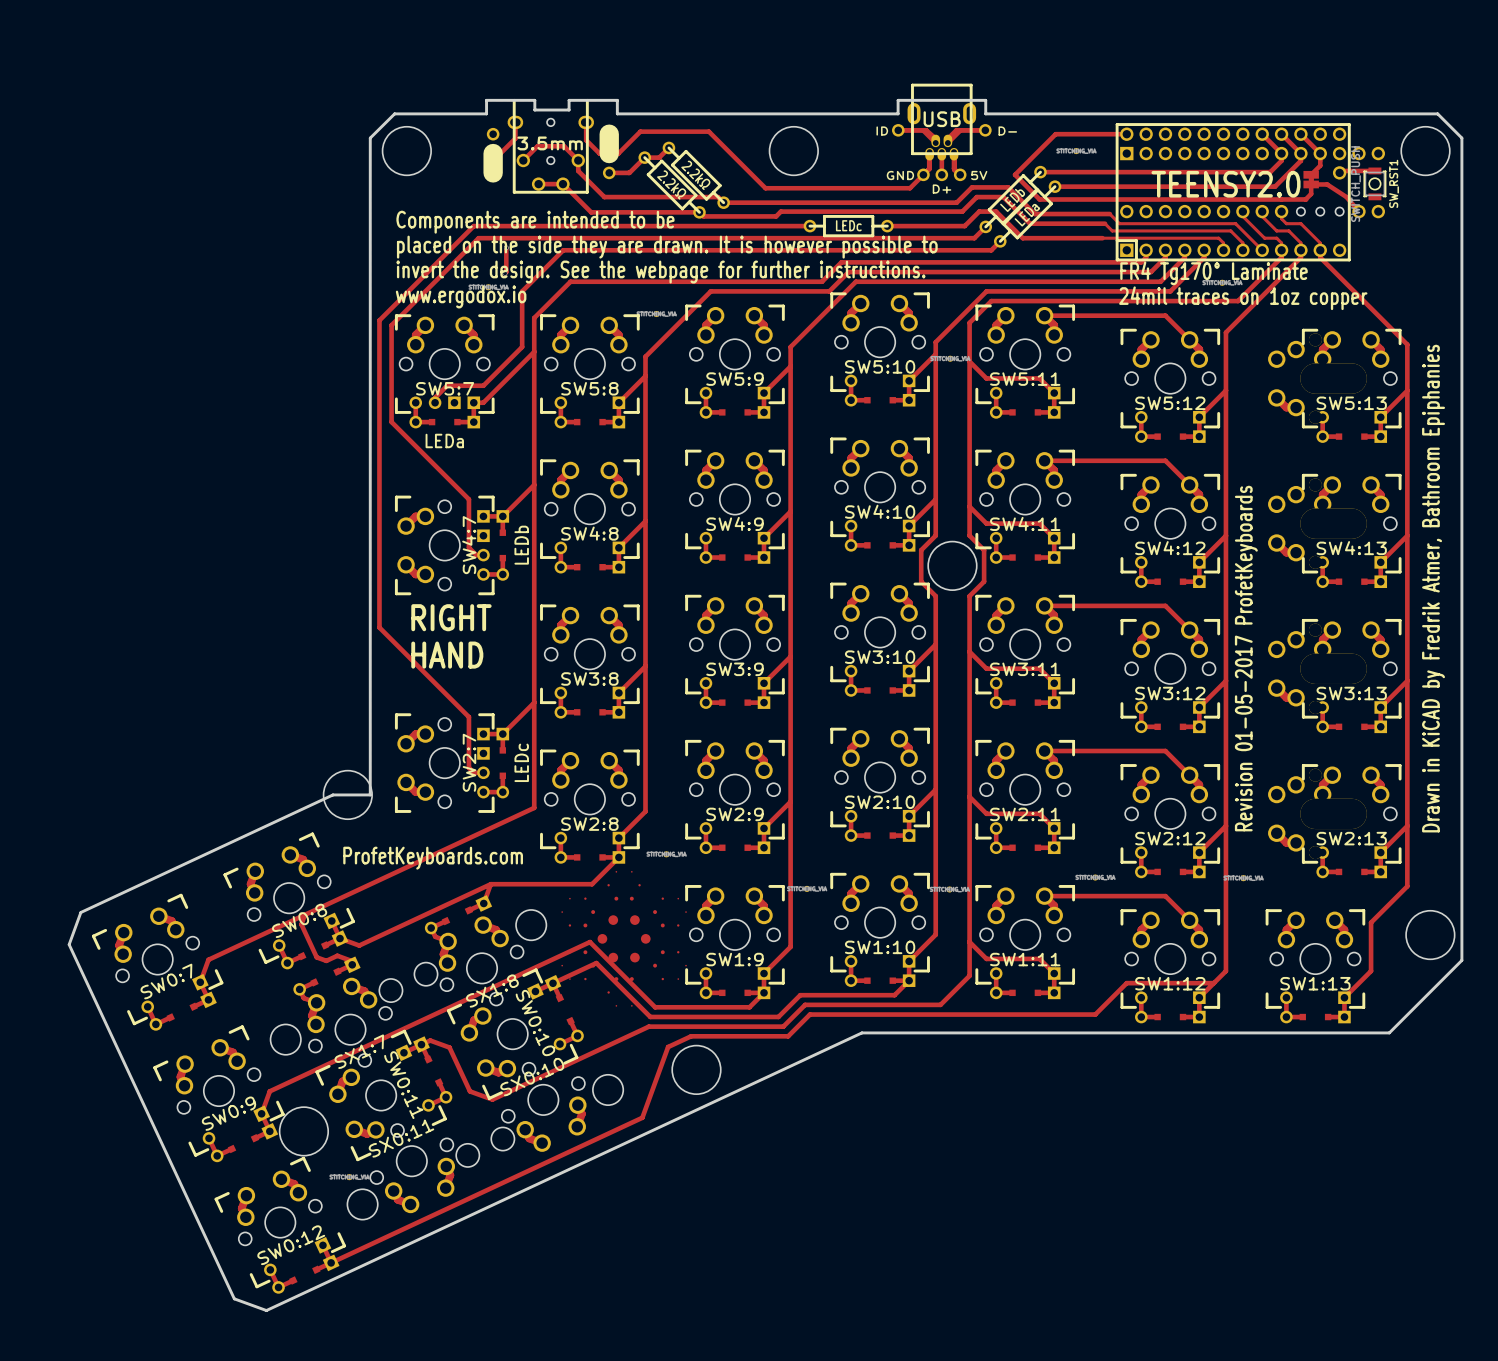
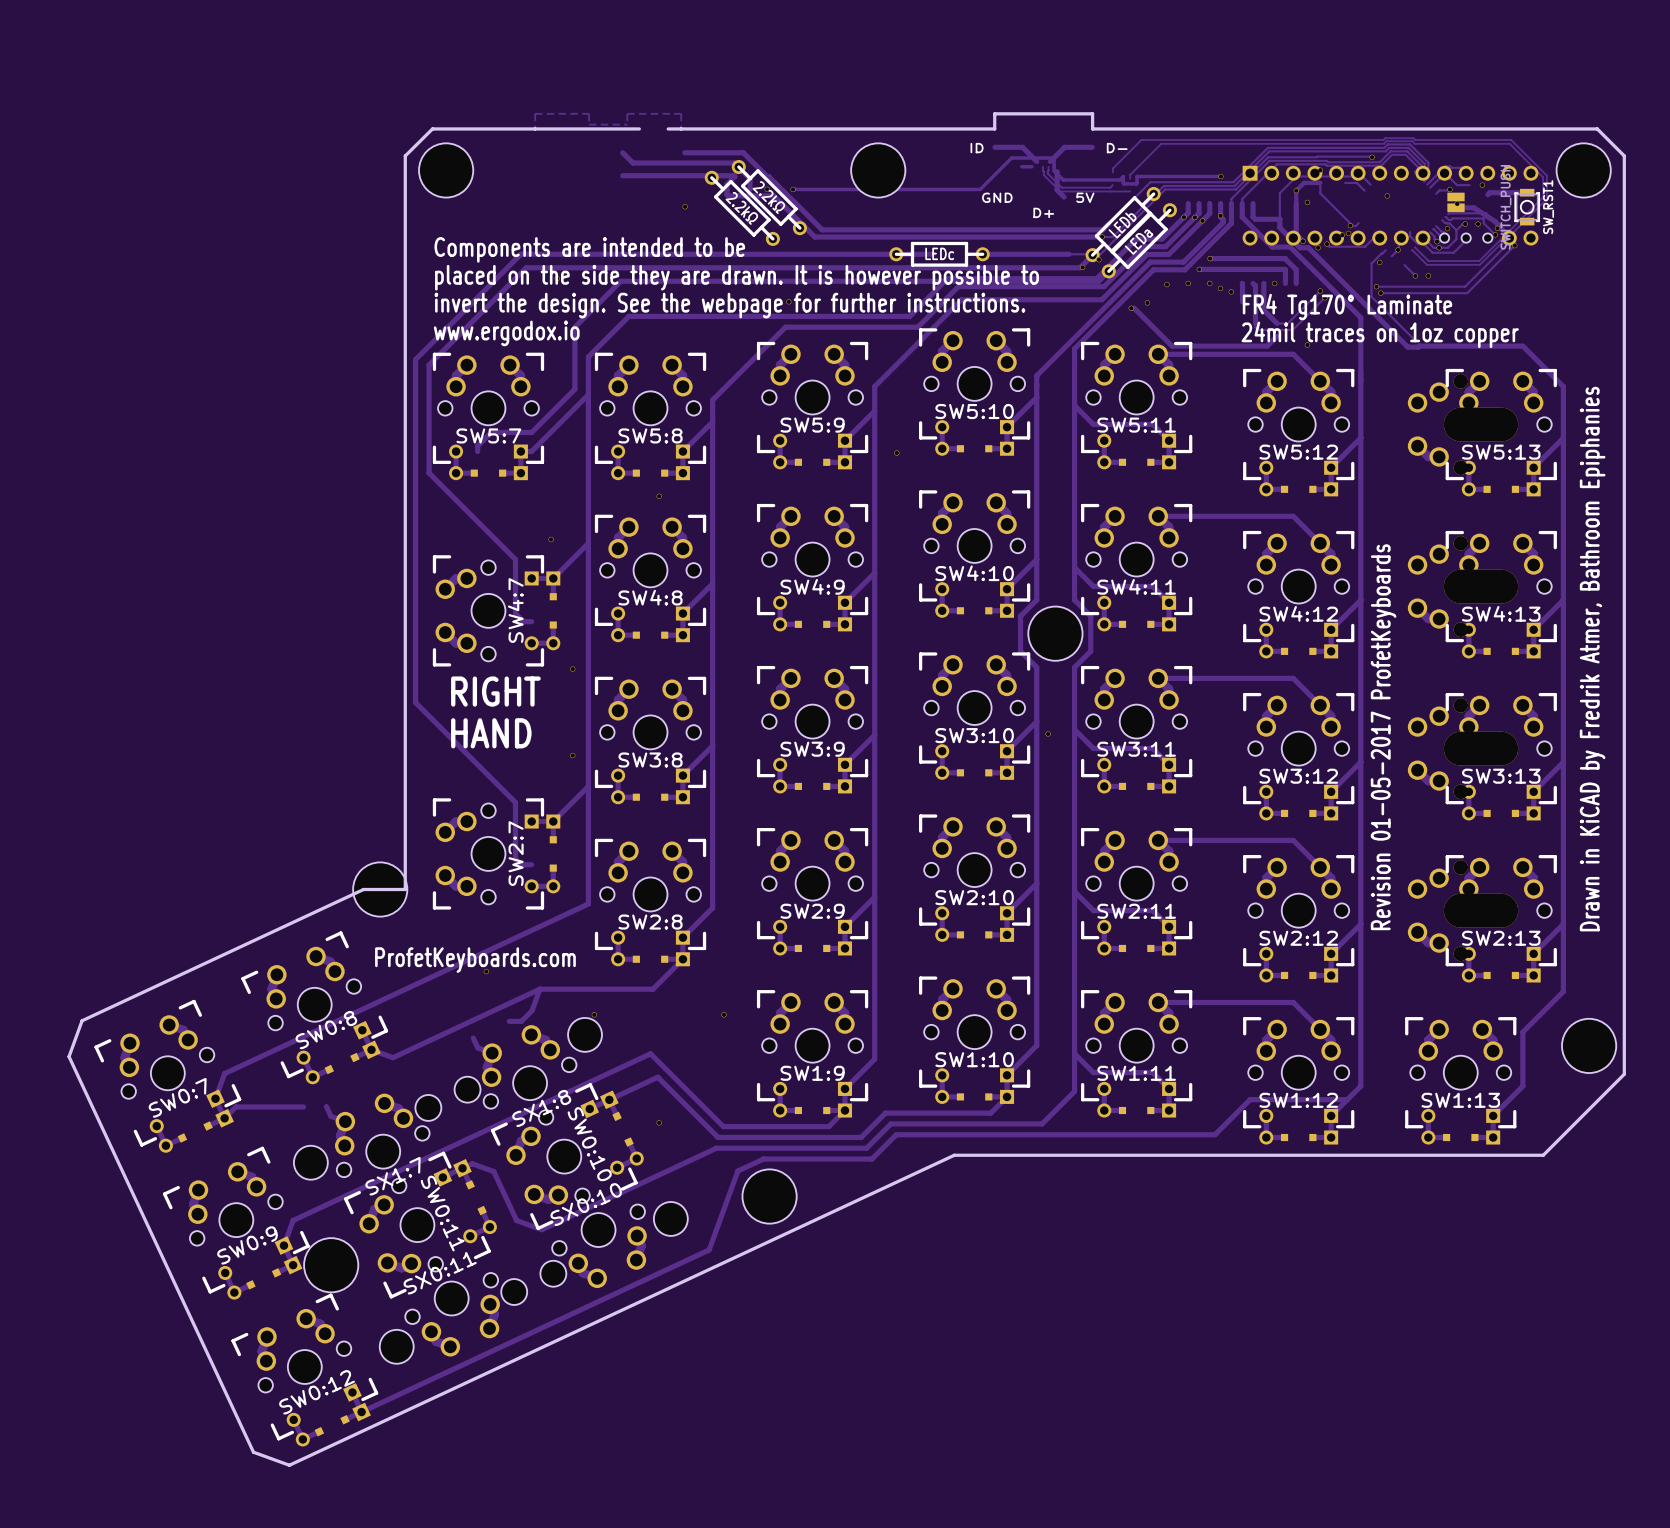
board edge: (486, 113) (486, 100) (534, 100) (534, 110) (569, 110) (569, 100) (617, 100) (617, 113) -> (535, 128) (639, 128)
board edge: none -> (668, 128) (681, 128)
track: (515, 122) (515, 138) (500, 153) (493, 153) -> none
track: (586, 122) (586, 140) (599, 153) (618, 153) (640, 131) (708, 131) (765, 188) (910, 188) (929, 168) (929, 152) (928, 153) -> none
part: USB (941, 132) -> none
track: (1126, 134) (1055, 134) (1015, 174) (1039, 199) (1306, 199) -> none
track: (1262, 134) (1281, 153) (1281, 160) (1270, 172) (1040, 172) -> none
track: (1281, 134) (1300, 153) (1300, 160) (1275, 186) (1054, 186) -> none
track: (1300, 134) (1320, 153) (1320, 165) (1311, 174) (1311, 193) (1305, 199) -> none
track: none -> (622, 152) (632, 163) (734, 163) (750, 178) (750, 189)
track: none -> (684, 152) (743, 152) (822, 229) (1102, 229) (1150, 182) (1233, 182) (1267, 147) (1384, 147) (1387, 144) (1410, 144) (1428, 162) (1428, 177) (1424, 181)
via: none -> (1372, 157)
part: 3.5mm (550, 146) -> none
track: (668, 147) (659, 157) (644, 157) (629, 172) (609, 172) -> none
track: none -> (1021, 166) (1031, 166)
track: none -> (1043, 166) (1043, 175) (1060, 191) (1130, 191)
track: none -> (1048, 166) (1047, 173) (1061, 187) (1110, 187) (1112, 185)
track: none -> (1469, 167) (1445, 166) (1427, 184)
via: none -> (1320, 170)
part: (609, 151) -> none
part: (1076, 151) -> none
track: none -> (1112, 172) (1112, 168) (1141, 140) (1383, 140) (1385, 138) (1413, 138) (1415, 140) (1511, 140) (1546, 175) (1546, 198) (1479, 264) (1427, 264) (1412, 250)
track: none -> (1415, 172) (1418, 167) (1405, 154) (1392, 154) (1381, 165) (1276, 164) (1242, 198) (1242, 217) (1272, 247) (1290, 247) (1360, 317) (1360, 381)
part: (493, 155) -> none
track: none -> (622, 175) (733, 175) (727, 184) (728, 195) (773, 195) (814, 236) (1112, 236) (1163, 186) (1234, 186) (1269, 151) (1385, 151) (1389, 147) (1408, 147) (1424, 164) (1424, 174) (1421, 178)
track: none -> (1418, 175) (1421, 172) (1421, 165) (1407, 151) (1390, 151) (1379, 162) (1269, 160) (1231, 198) (1231, 223) (1184, 269) (1153, 269) (1074, 348) (1074, 365)
track: none -> (1220, 176) (1137, 176) (1136, 183) (1123, 183) (1123, 176) (1120, 179) (1063, 179) (1054, 170) (1052, 158) (1011, 158) (980, 189) (793, 189)
via: none -> (1220, 176)
track: none -> (1130, 178) (1130, 174) (1161, 143) (1383, 143) (1386, 141) (1412, 141) (1414, 143) (1509, 143) (1543, 177) (1543, 197) (1479, 261) (1428, 261) (1415, 247)
track: (523, 160) (537, 146) (564, 146) (578, 160) (578, 170) (604, 197) (718, 197) (723, 202) (956, 202) (972, 187) (1008, 187) (1034, 214) (1109, 214) (1119, 223) (1235, 223) (1262, 250) -> none
track: none -> (1345, 182) (1356, 182) (1364, 190)
track: none -> (1370, 184) (1362, 176) (1296, 176) (1279, 193) (1279, 219)
track: none -> (1469, 185) (1456, 185) (1449, 178) (1439, 178) (1430, 187)
via: none -> (1482, 185)
via: none -> (767, 189)
via: none -> (793, 189)
track: none -> (1449, 189) (1439, 190) (1436, 193)
via: none -> (1449, 189)
via: none -> (1296, 190)
via: none -> (1387, 195)
via: none -> (1307, 202)
track: none -> (1220, 203) (1220, 217) (1223, 222) (1183, 262) (1150, 262) (1036, 375) (1036, 386)
track: none -> (1253, 203) (1253, 217) (1255, 219) (1279, 219)
via: none -> (1457, 203)
via: none -> (685, 206)
track: (538, 184) (562, 184) (591, 212) (699, 212) (703, 216) (776, 216) (780, 211) (962, 211) (976, 197) (1003, 197) (1030, 223) (1105, 223) (1112, 230) (1230, 230) (1242, 243) (1242, 250) -> none
track: none -> (1448, 214) (1486, 213) (1497, 224) (1497, 228)
via: none -> (1220, 215)
via: none -> (1183, 217)
part: TEENSY2.0 (1233, 192) -> none
track: none -> (1445, 217) (1448, 220) (1483, 218) (1483, 223) (1495, 234)
via: none -> (1194, 217)
track: none -> (1442, 220) (1449, 223) (1456, 230) (1456, 239) (1447, 247) (1433, 247) (1424, 238)
via: none -> (1202, 220)
track: none -> (1358, 223) (1352, 226) (1320, 193) (1320, 182) (1304, 182) (1296, 190) (1296, 234) (1303, 241)
track: none -> (1465, 224) (1456, 230)
via: none -> (1465, 224)
via: none -> (1478, 224)
via: none -> (1350, 225)
track: none -> (1436, 226) (1447, 235)
via: none -> (1497, 228)
track: none -> (1433, 229) (1441, 236)
via: none -> (1447, 228)
track: none -> (1409, 232) (1409, 236) (1418, 244)
track: none -> (1430, 232) (1437, 241)
via: none -> (1348, 233)
via: none -> (1342, 235)
via: none -> (1495, 234)
via: none -> (1102, 236)
track: none -> (1373, 238) (1365, 246) (1329, 246) (1326, 244)
track: (1242, 211) (1242, 216) (1264, 238) (1276, 238) (1281, 243) (1281, 257) (1238, 301) (991, 301) (969, 322) -> none
track: (1262, 211) (1262, 216) (1276, 230) (1288, 230) (1300, 243) (1300, 257) (1225, 332) -> none
track: (1281, 211) (1281, 218) (1286, 223) (1300, 223) (1320, 243) (1320, 257) (1371, 308) -> (1279, 219) (1279, 227) (1299, 247) (1308, 247) (1407, 347) (1522, 346)
via: none -> (1303, 241)
track: none -> (1421, 241) (1432, 252) (1453, 252) (1465, 241)
via: none -> (1437, 241)
track: none -> (1398, 243) (1398, 249) (1391, 256)
via: none -> (1326, 244)
track: none -> (1506, 245) (1465, 286) (1376, 286)
track: none -> (1514, 245) (1467, 293) (1380, 293)
via: none -> (1514, 245)
via: none -> (1318, 247)
via: none -> (1439, 247)
track: none -> (1385, 250) (1371, 263) (1371, 296) (1415, 340)
via: none -> (1398, 249)
track: none -> (896, 254) (933, 254)
track: (964, 226) (979, 211) (996, 211) (1022, 238) (1218, 238) (1223, 243) (1223, 250) -> (1069, 254) (1100, 254) (1165, 189) (1236, 189) (1268, 157) (1372, 157)
track: none -> (1210, 258) (1285, 258) (1296, 269) (1296, 283)
via: none -> (1210, 258)
via: none -> (1098, 259)
via: none -> (1379, 262)
track: none -> (1404, 265) (1415, 275)
via: none -> (1082, 267)
track: none -> (1199, 269) (1285, 269) (1285, 283)
via: none -> (1199, 269)
via: none -> (1415, 275)
via: none -> (1428, 275)
track: (506, 247) (505, 273) -> none
track: (1146, 250) (1146, 257) (1141, 262) (841, 262) -> (1188, 203) (1188, 213) (1162, 239) (1136, 239) (1096, 278) (947, 278) (931, 294)
track: (1165, 250) (1165, 257) (1150, 272) (848, 272) -> (1199, 203) (1199, 213) (1165, 246) (1143, 246) (1104, 286) (958, 286) (939, 305)
track: (1184, 250) (1184, 257) (1160, 281) (855, 281) (790, 347) -> (1209, 203) (1209, 213) (1168, 254) (1147, 254) (1101, 299) (961, 299) (874, 386) (874, 389)
track: (1204, 250) (1204, 257) (1170, 291) (986, 291) (935, 342) -> none
via: none -> (1188, 283)
via: none -> (1209, 283)
track: none -> (1242, 283) (1242, 301)
track: none -> (1253, 283) (1255, 285) (1255, 327) (1257, 329) (1292, 329) (1324, 297)
track: none -> (1263, 283) (1263, 310) (1277, 323) (1287, 323) (1320, 291)
via: none -> (1274, 283)
via: none -> (1166, 284)
via: none -> (1376, 286)
via: none -> (1220, 288)
via: none -> (1231, 291)
via: none -> (1320, 291)
via: none -> (1380, 293)
via: none -> (1324, 297)
via: none -> (788, 301)
via: none -> (1147, 302)
via: (505, 273) -> none
track: none -> (1131, 308) (1134, 308) (1172, 346) (1267, 346) (1277, 336)
via: none -> (1131, 308)
part: (1222, 282) -> none
part: (488, 287) -> none
via: none -> (1307, 345)
part: (656, 314) -> none
part: (950, 358) -> none
part: LEDa (444, 402) -> none
via: none -> (896, 453)
via: none -> (659, 496)
via: none -> (551, 539)
part: LEDb (483, 545) -> none
via: none -> (572, 669)
via: none -> (1048, 733)
via: none -> (572, 755)
part: LEDc (483, 763) -> none
part: (666, 854) -> none
via: none -> (486, 971)
part: (1095, 877) -> none
part: (1243, 878) -> none
part: (806, 888) -> none
part: (949, 889) -> none
track: none -> (532, 1010) (521, 1021) (509, 1021)
via: none -> (594, 1014)
via: none -> (723, 1014)
track: (304, 914) (301, 924) (316, 957) (326, 960) (337, 955) (350, 960) (352, 964) -> none
part: (458, 914) -> none
part: (624, 938) -> none
part: (327, 976) -> none
track: none -> (303, 1106) (235, 1106) (230, 1112)
via: none -> (659, 1122)
part: (349, 1177) -> none

